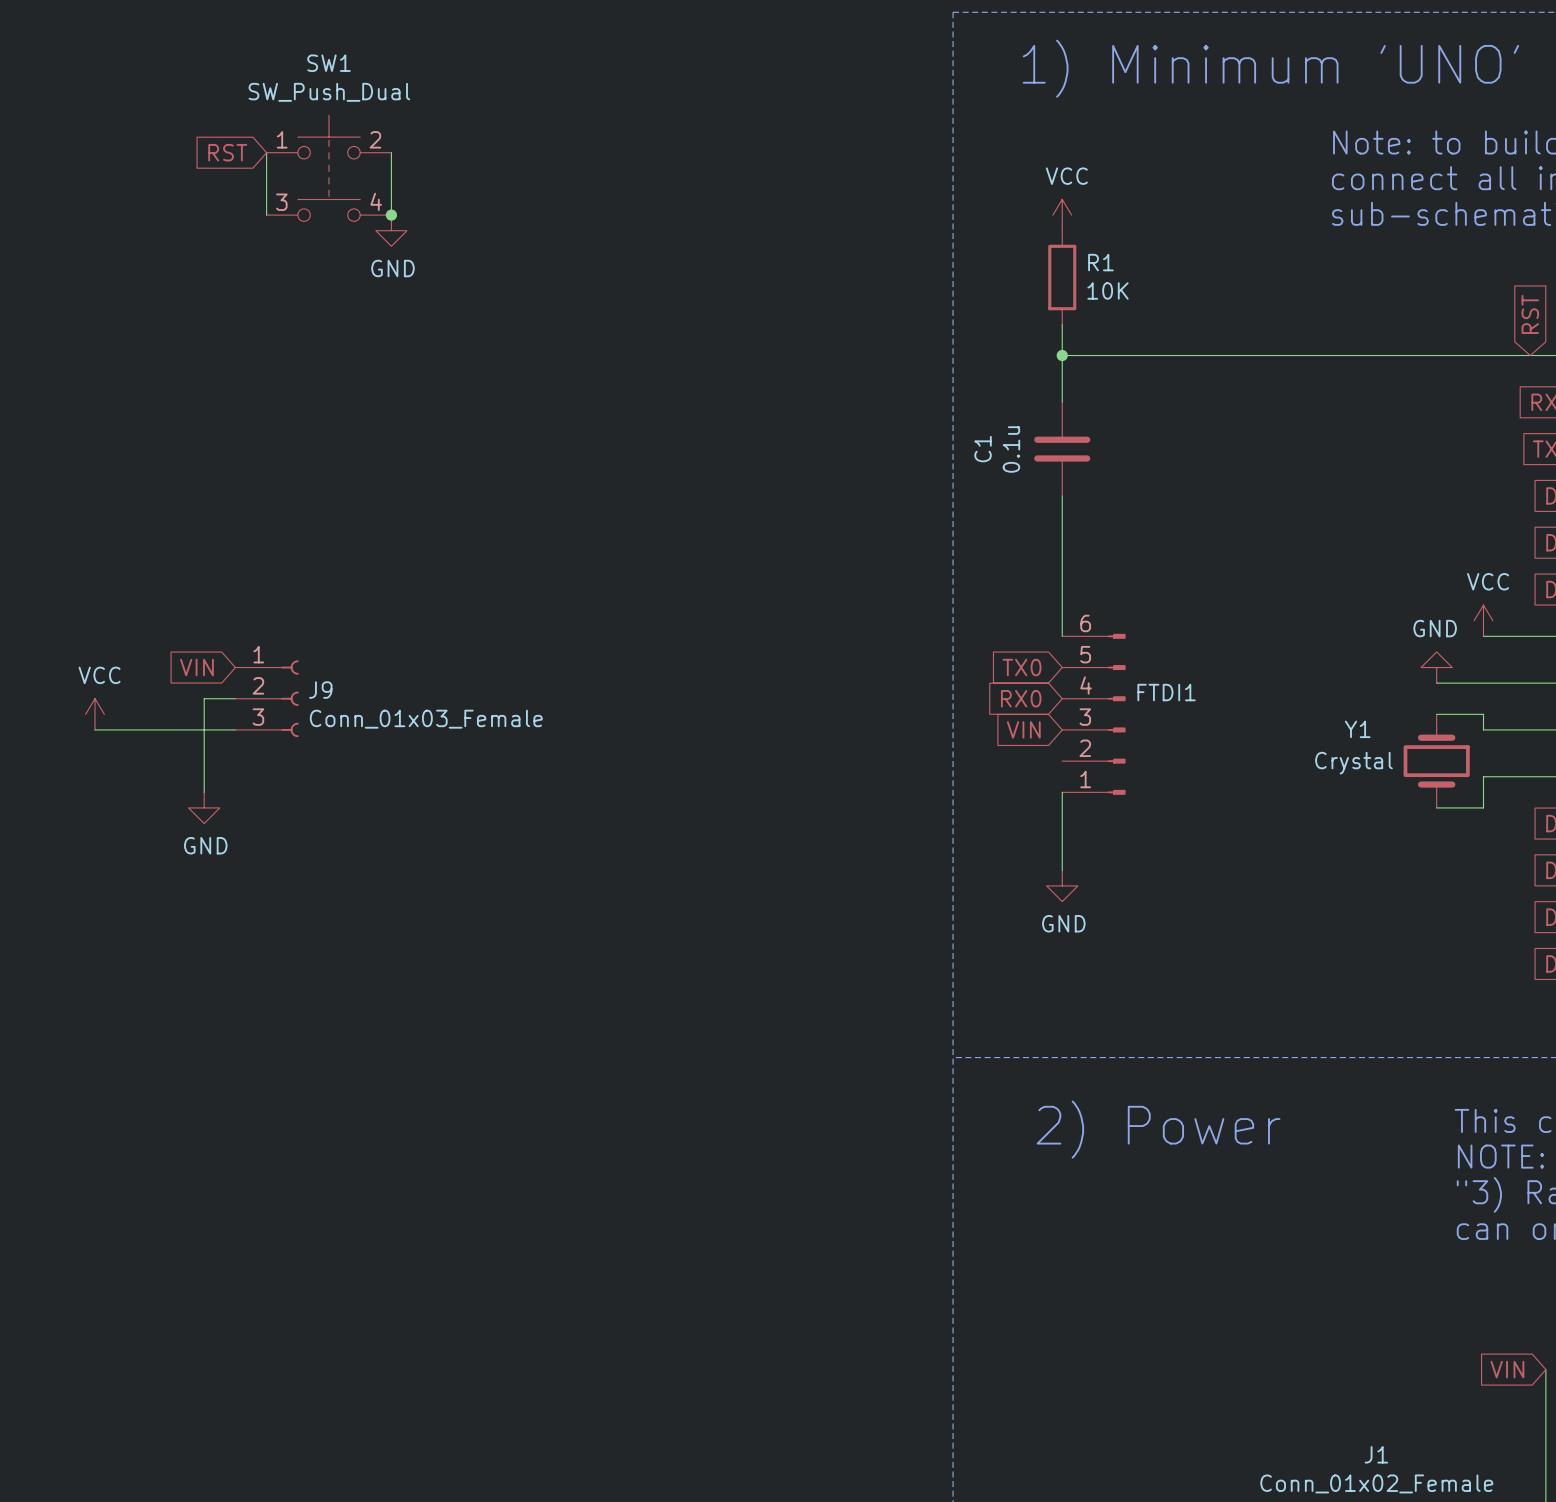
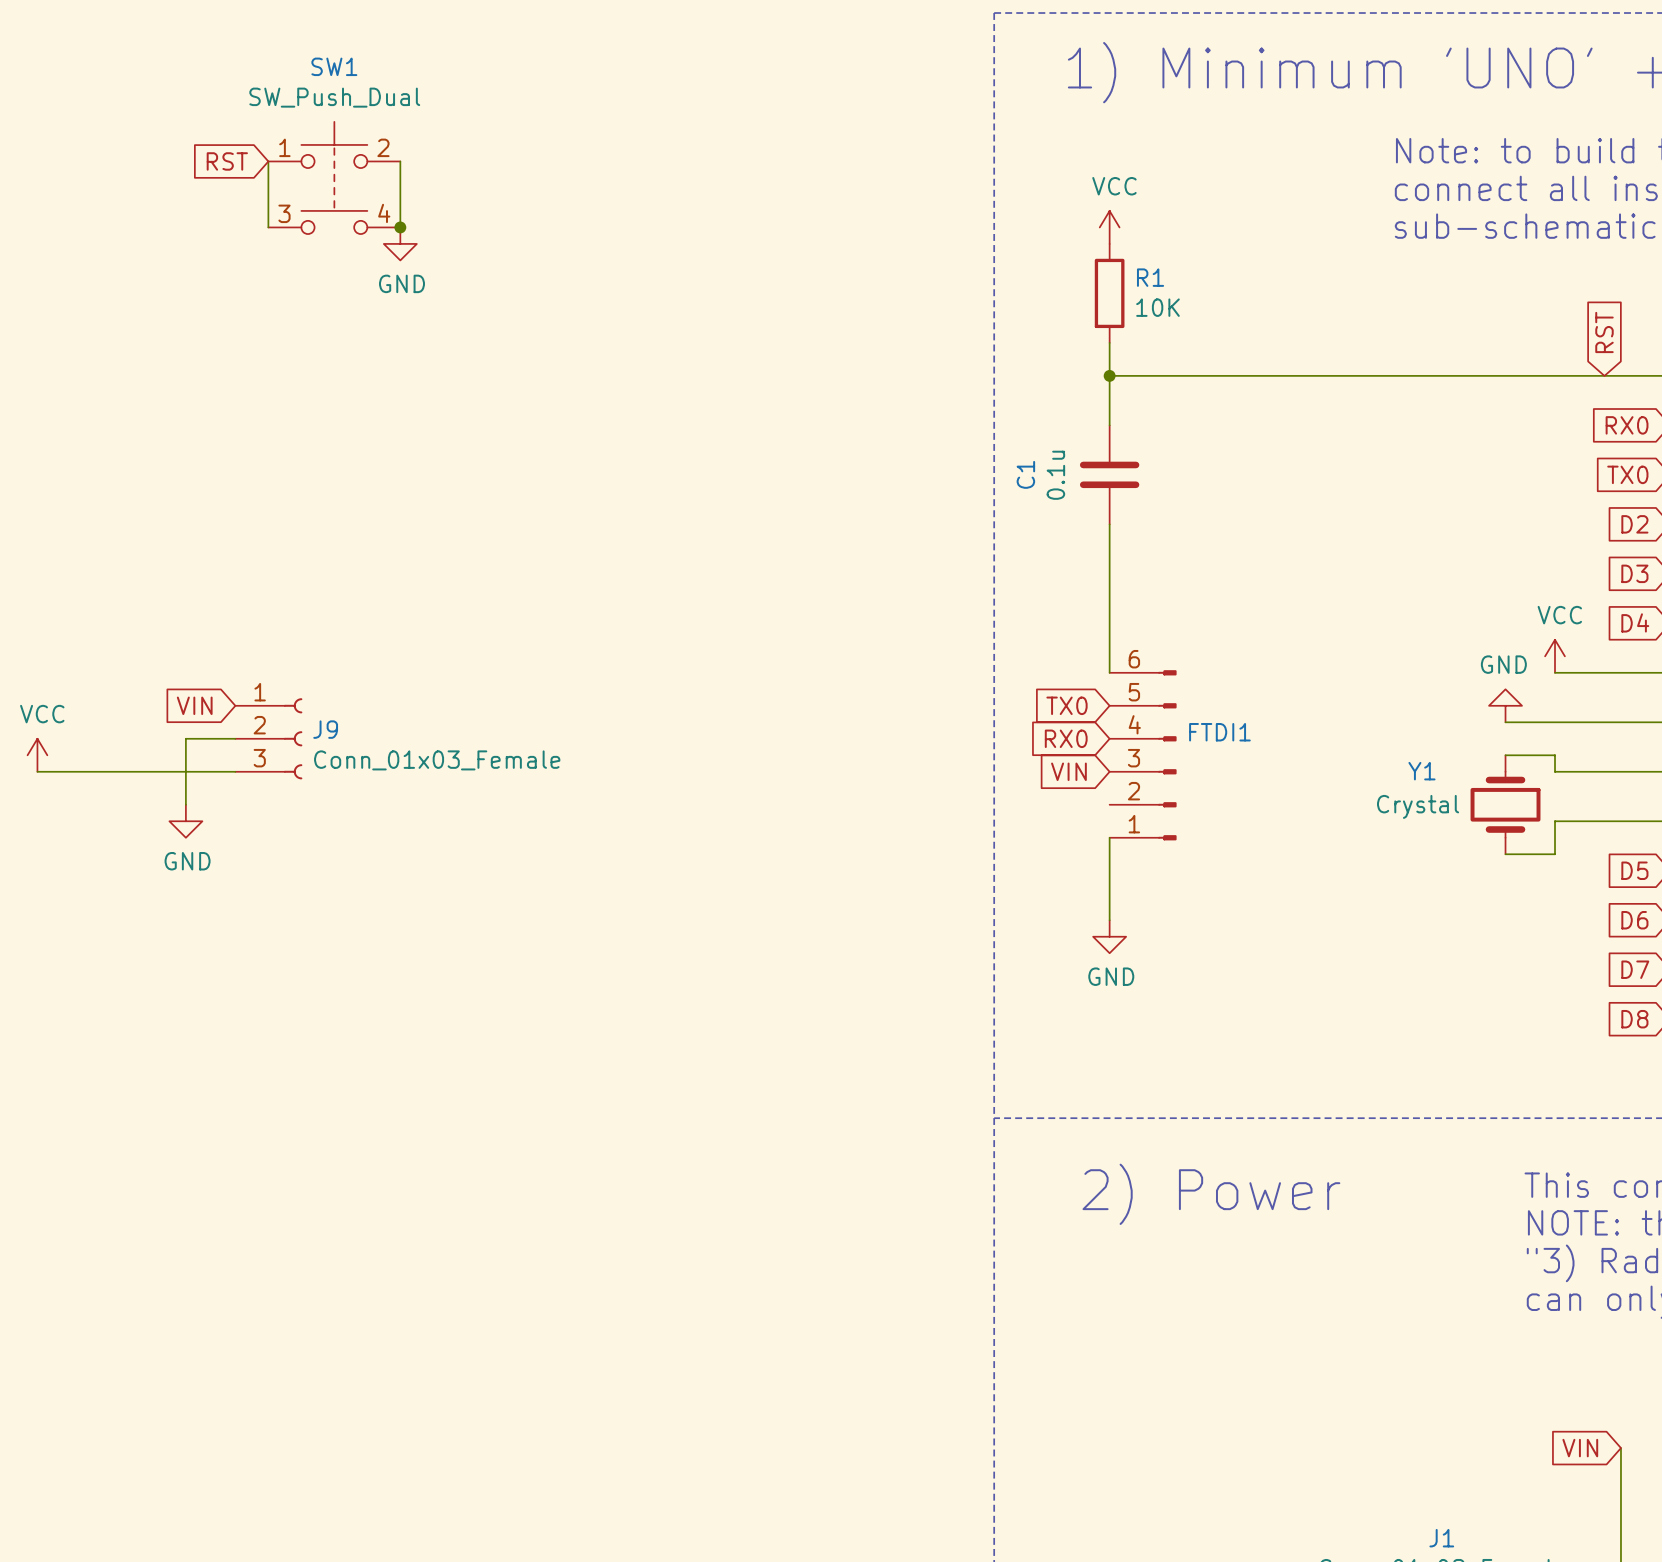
wire: (204, 698) (204, 792) -> (202, 738) (185, 738) (185, 804)
power symbol position: VCC (94, 714) -> VCC (37, 755)
wire: none -> (37, 771) (86, 771)
power symbol position: GND (204, 807) -> GND (185, 821)

